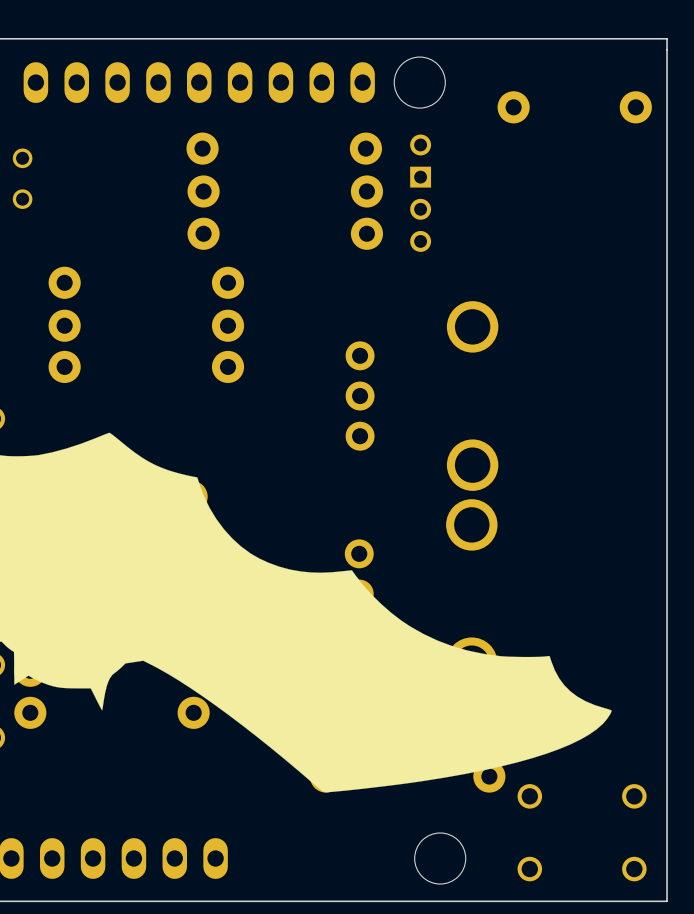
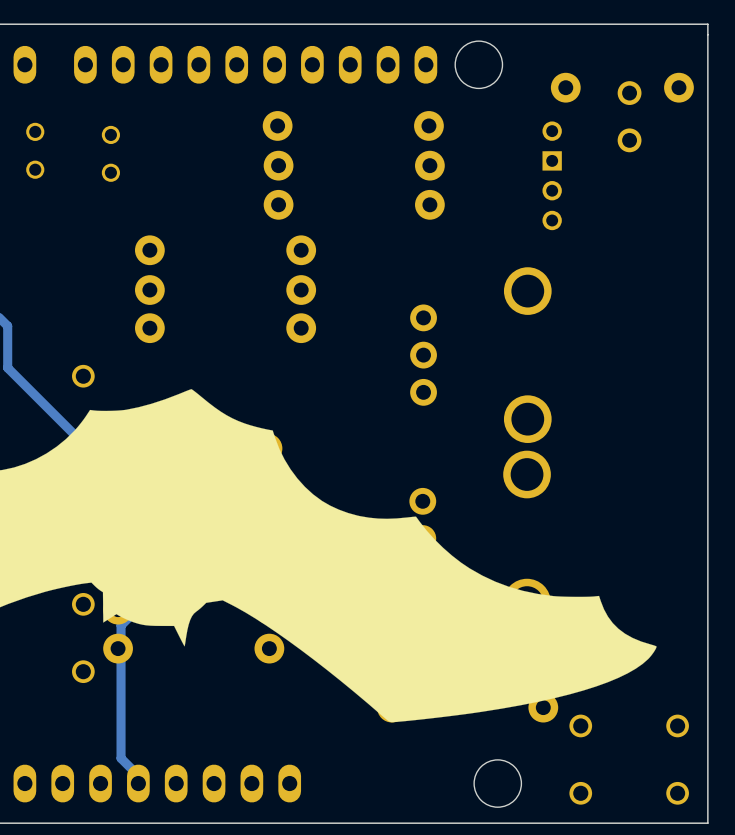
part: none -> (629, 116)
part position: (420, 193) -> (552, 175)
track: none -> (142, 604) (121, 625) (121, 758) (138, 775) (138, 783)

